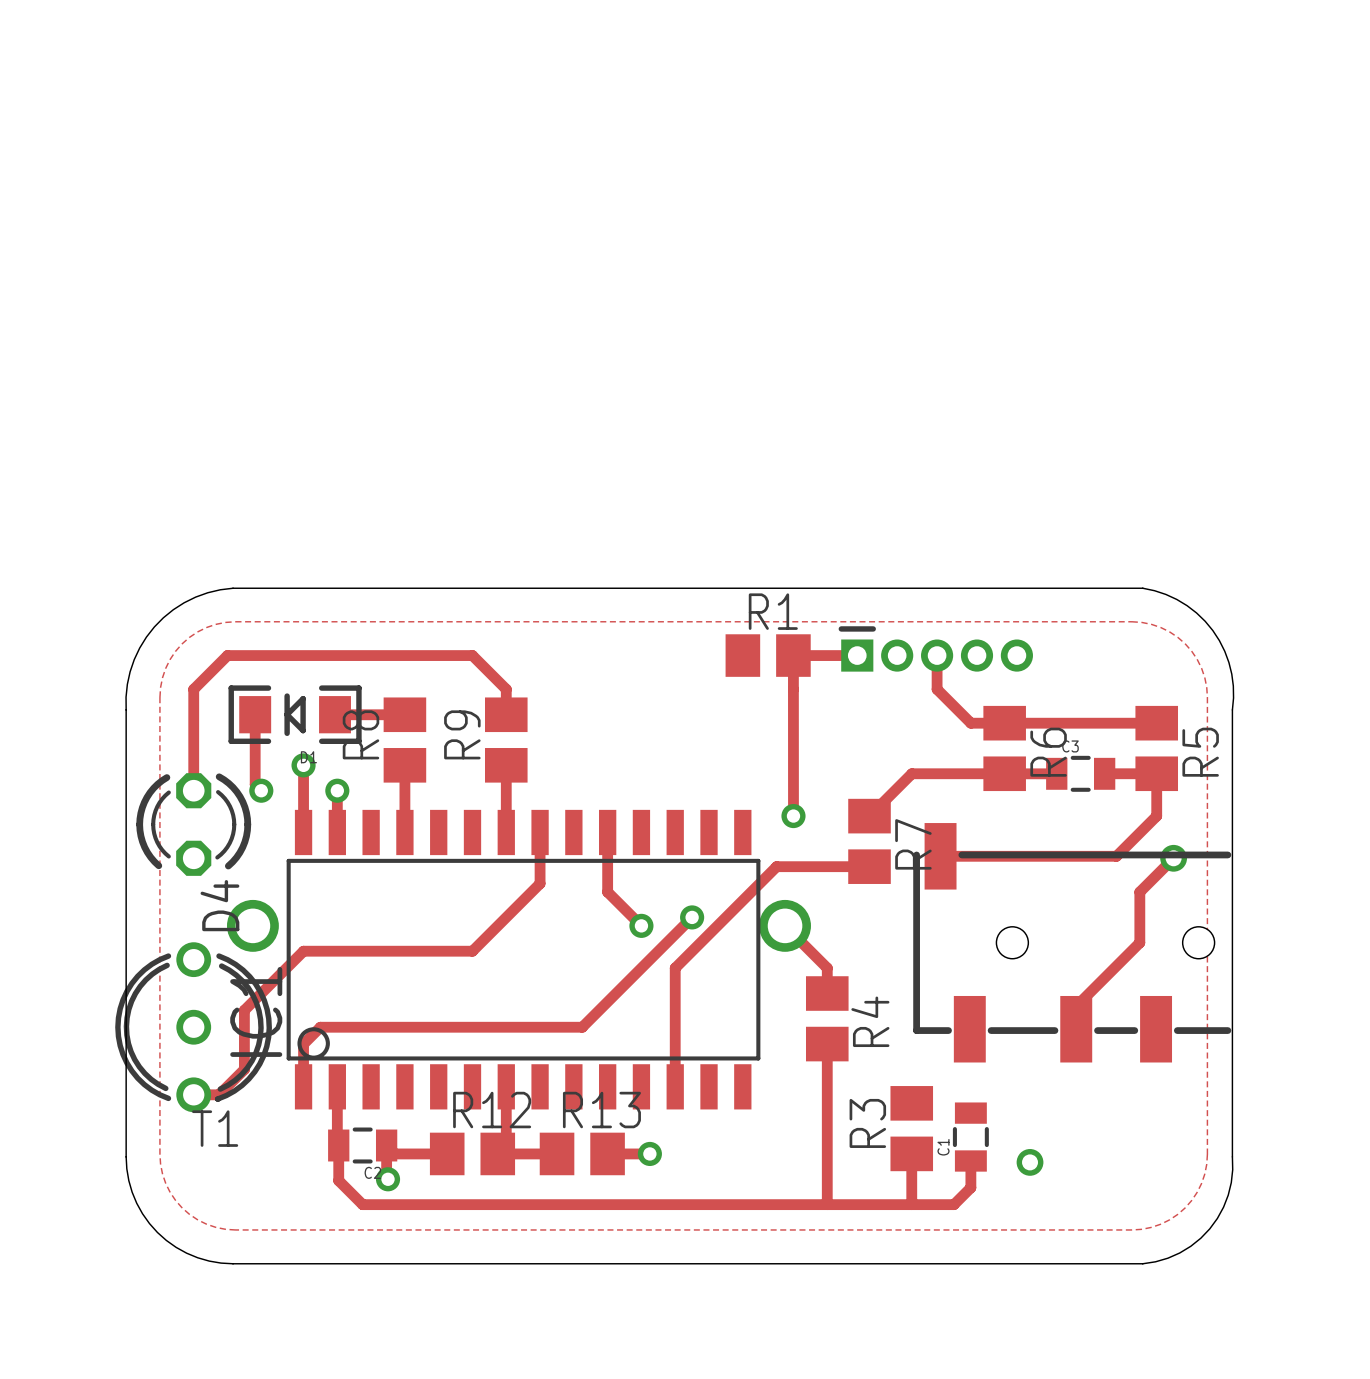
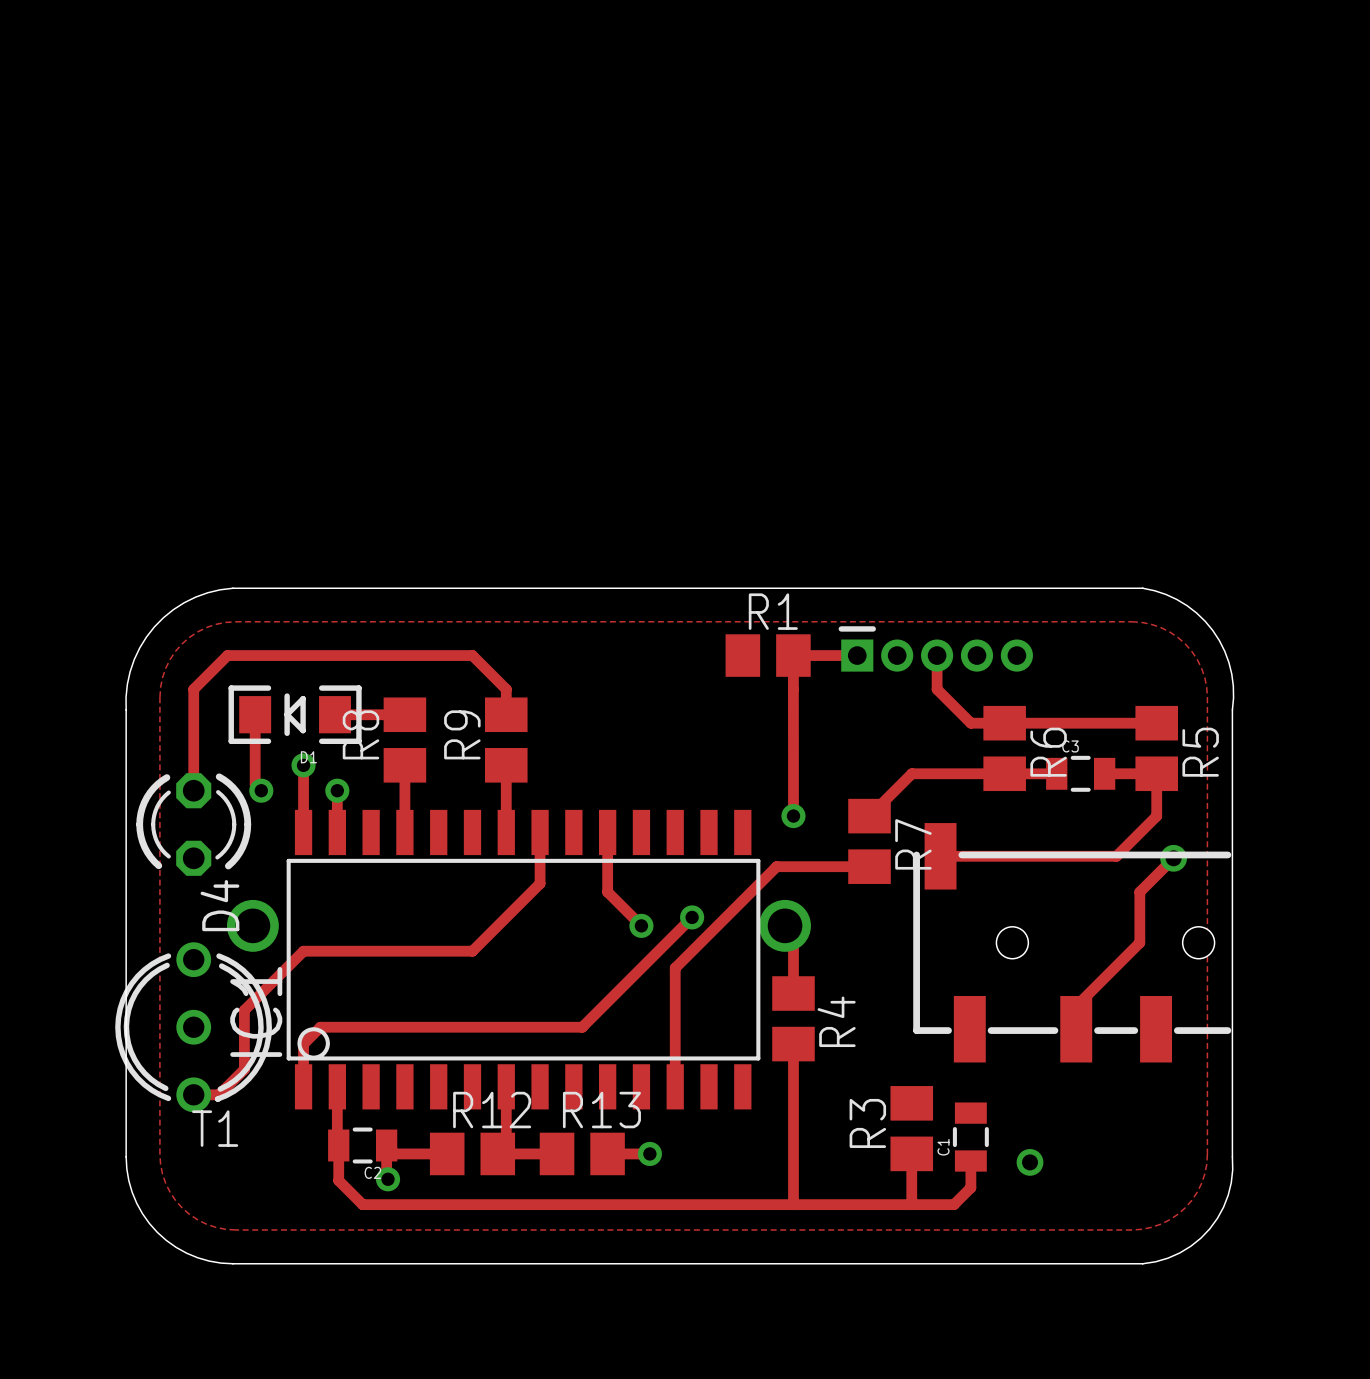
track: (793, 934) (827, 968) (827, 993) -> (793, 934) (793, 993)
R4 position: (827, 1018) -> (793, 1018)
track: (827, 1044) (827, 1204) -> (793, 1044) (793, 1204)

